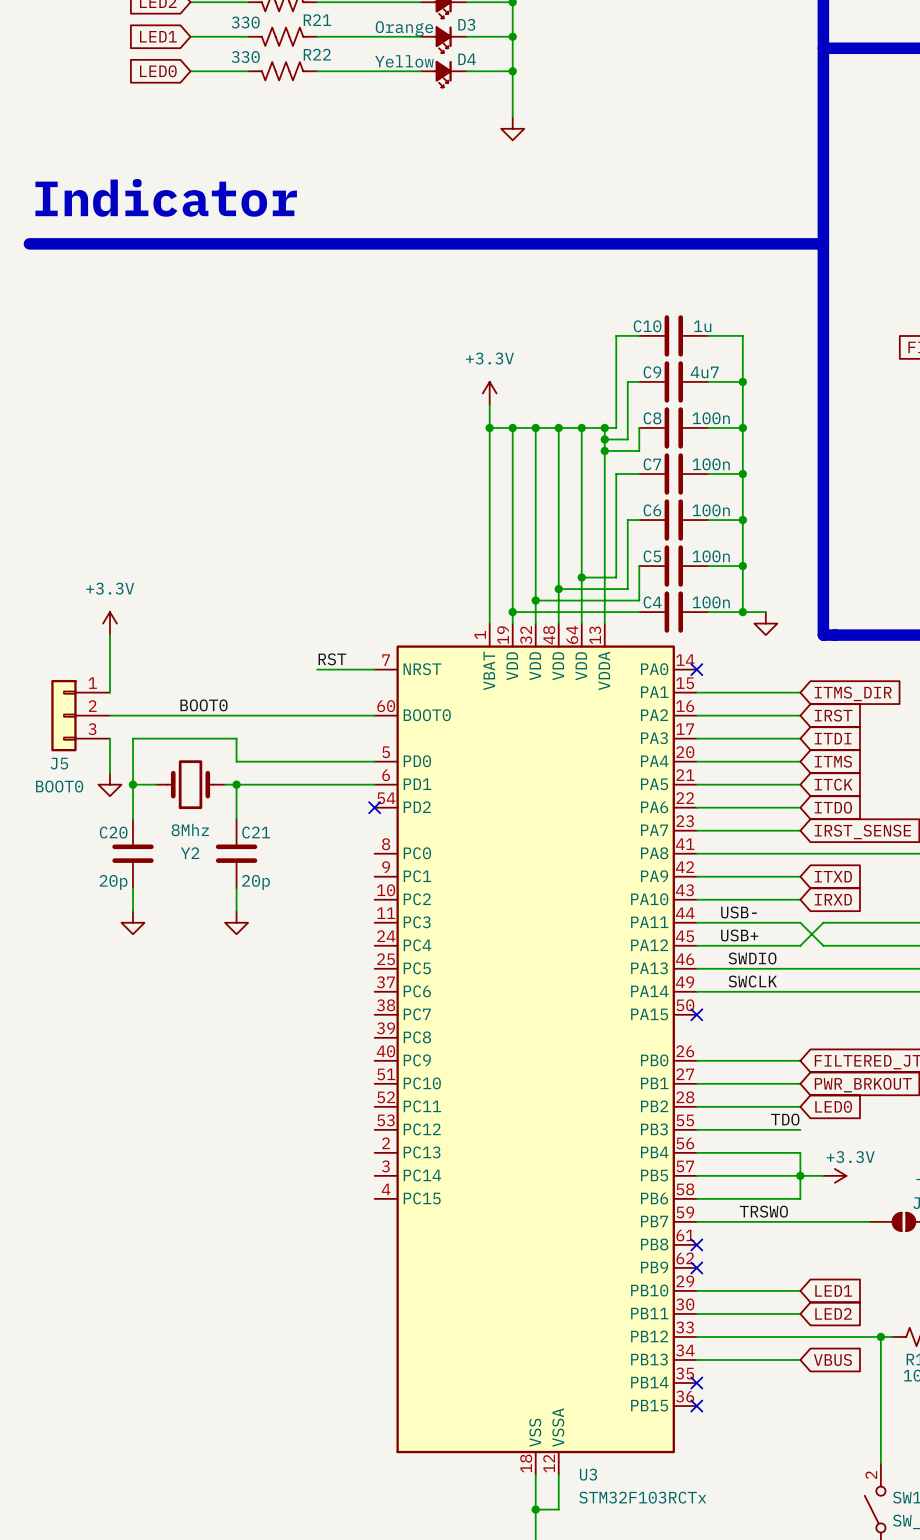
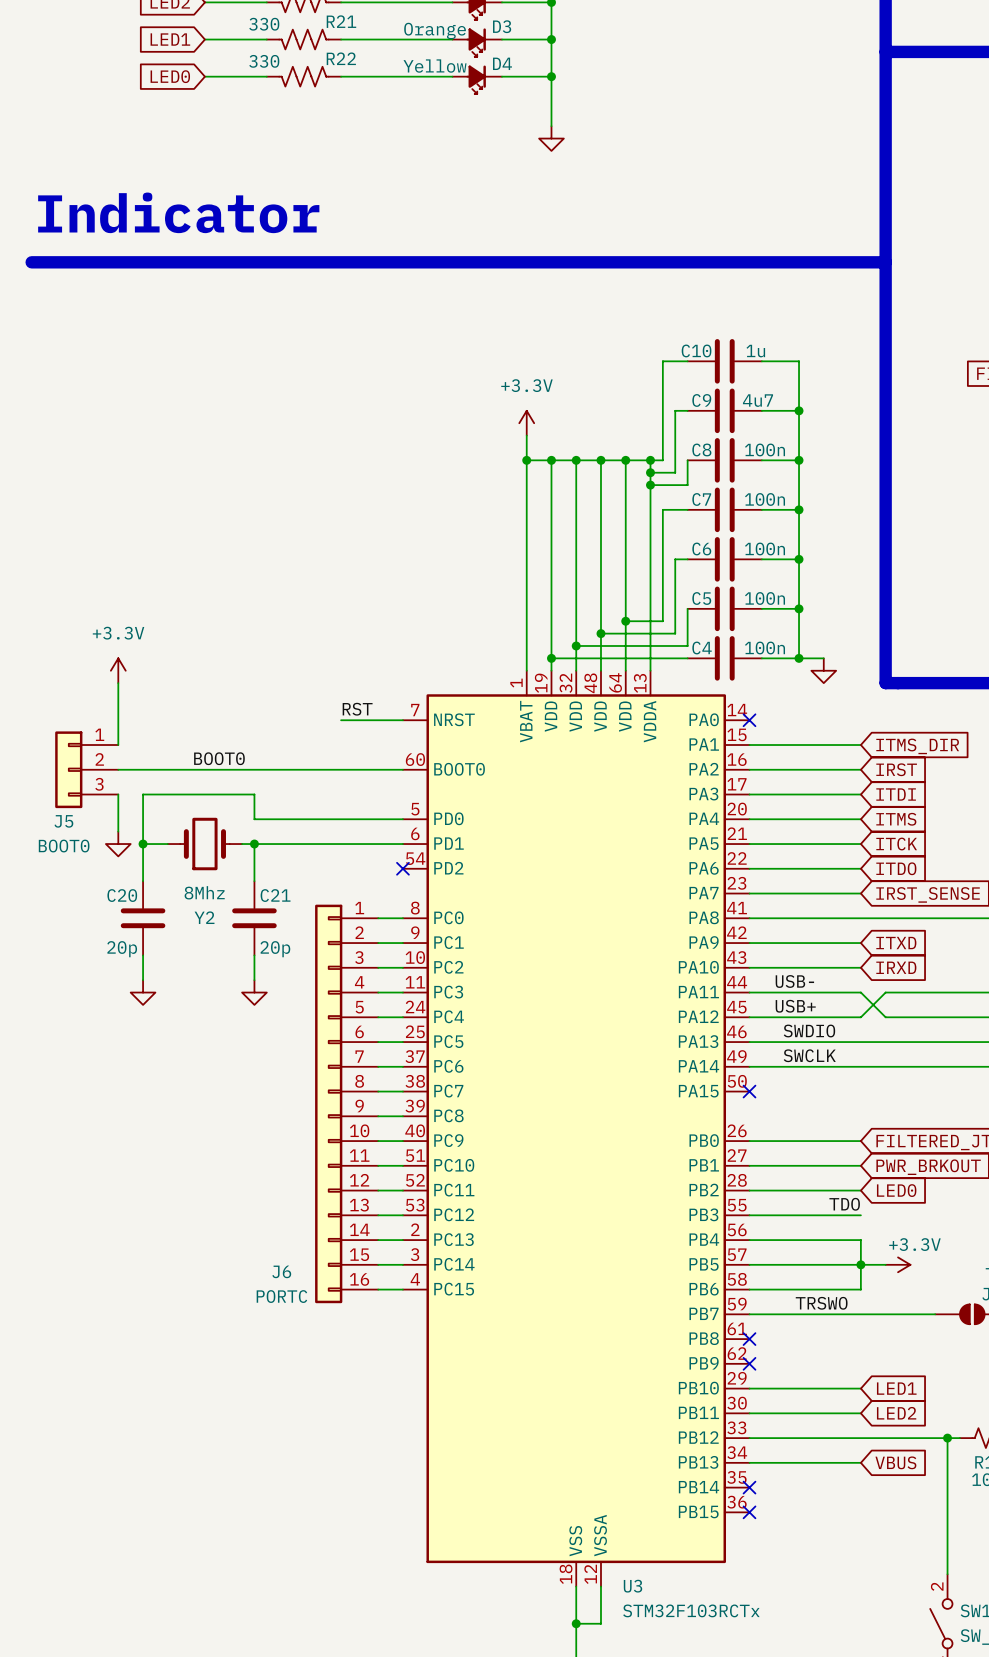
wire: none -> (378, 918) (402, 918)
wire: none -> (378, 943) (402, 943)
wire: none -> (378, 967) (402, 967)
wire: none -> (378, 992) (402, 992)
wire: none -> (378, 1017) (402, 1017)
wire: none -> (378, 1042) (402, 1042)
wire: none -> (378, 1066) (402, 1066)
wire: none -> (378, 1091) (402, 1091)
J6: none -> PORTC (346, 1103)
wire: none -> (378, 1116) (402, 1116)
wire: none -> (378, 1141) (402, 1141)
wire: none -> (378, 1165) (402, 1165)
wire: none -> (378, 1190) (402, 1190)
wire: none -> (378, 1215) (402, 1215)
wire: none -> (378, 1240) (402, 1240)
wire: none -> (378, 1264) (402, 1264)
wire: none -> (378, 1289) (402, 1289)

